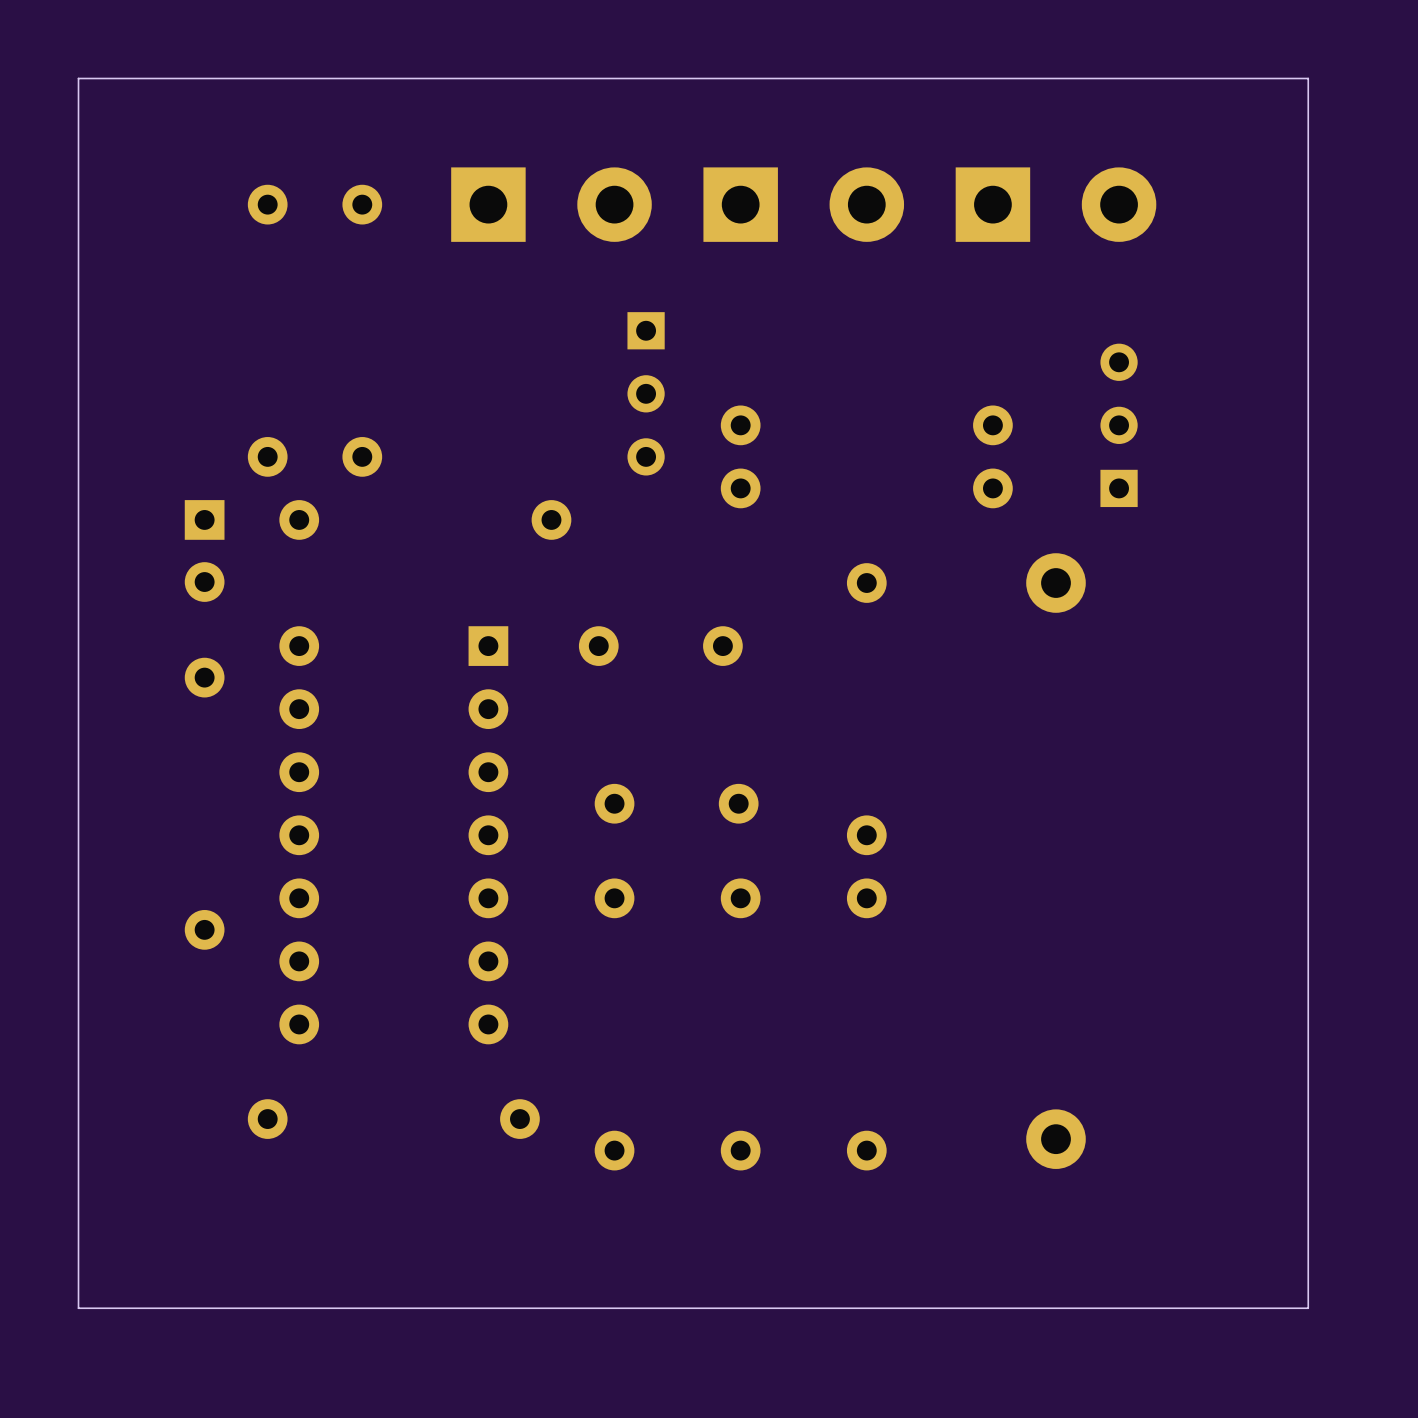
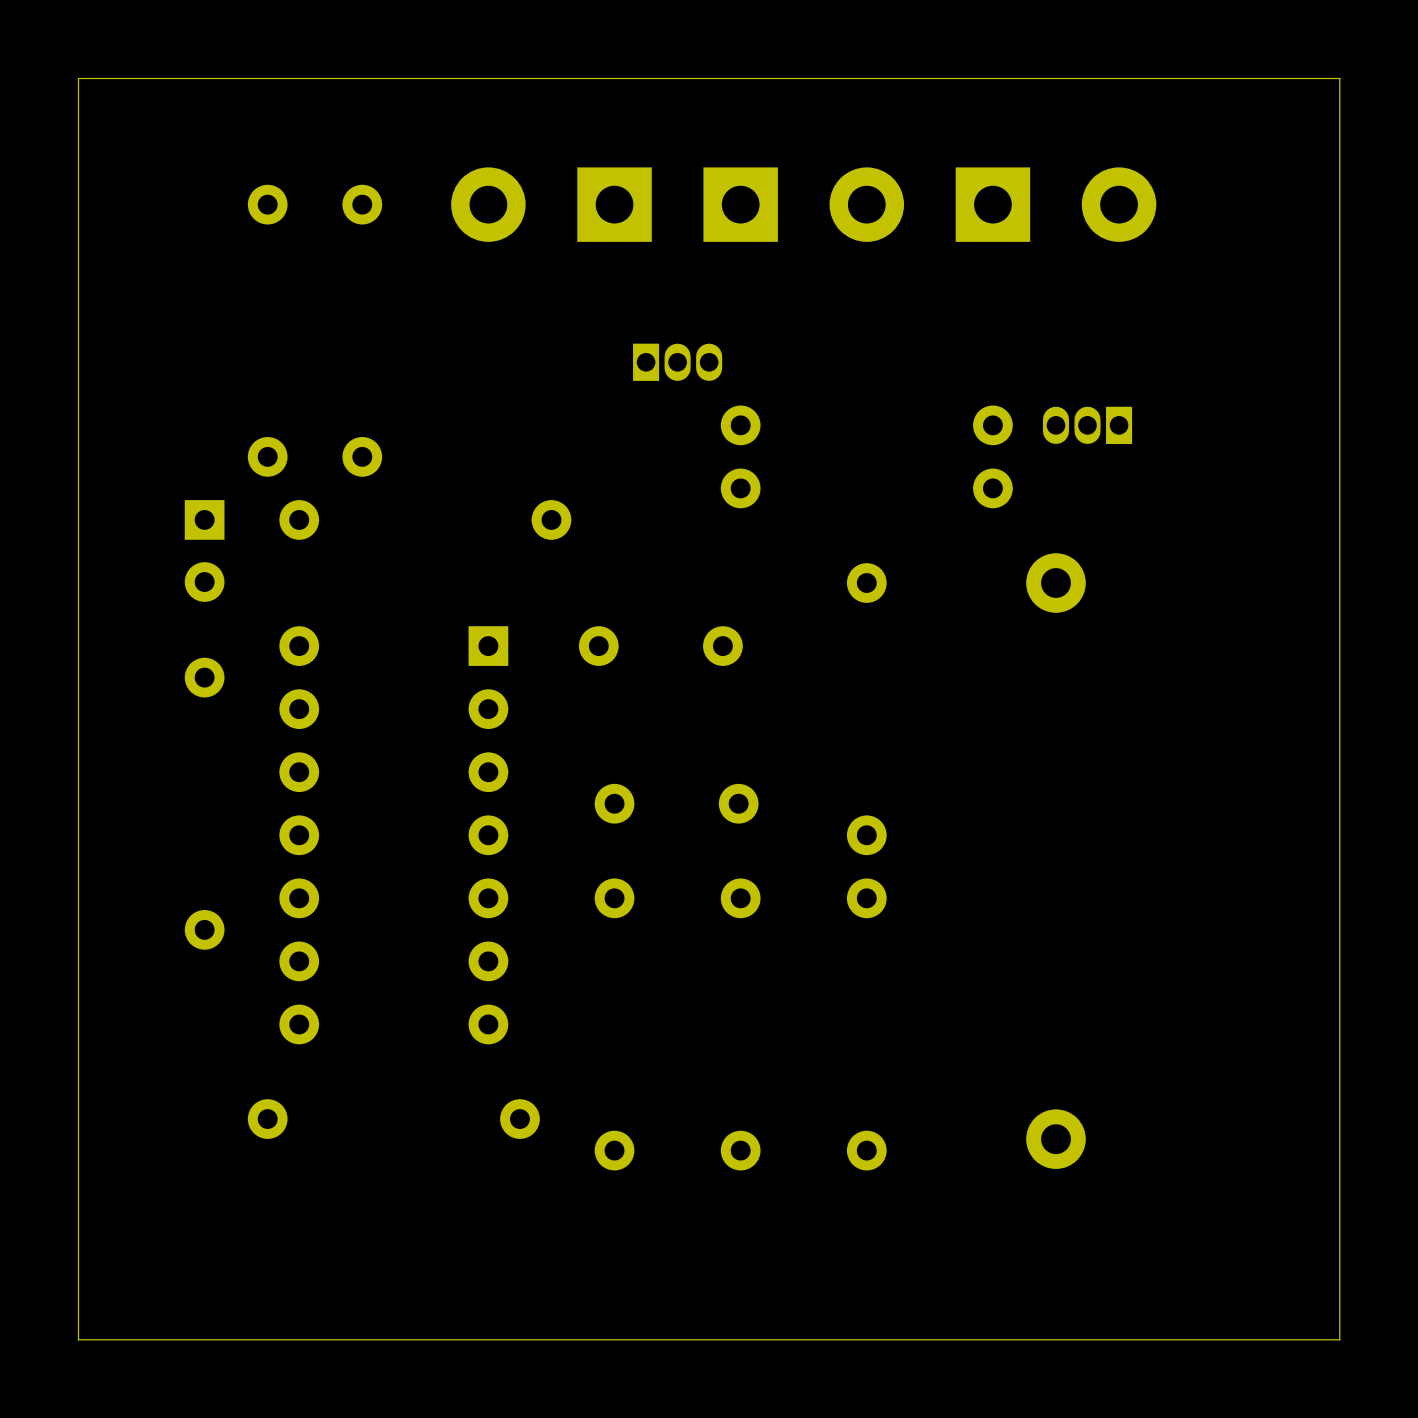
board edge: (1308, 78) (1308, 1308) (78, 1308) -> (1308, 78) (1339, 78) (1339, 1339) (78, 1339) (78, 1308)
part rotation: 0° (551, 204) -> 180° (551, 204)
part: none -> (677, 362)
part: (646, 393) -> none
part: none -> (1087, 425)
part: (1119, 425) -> none

